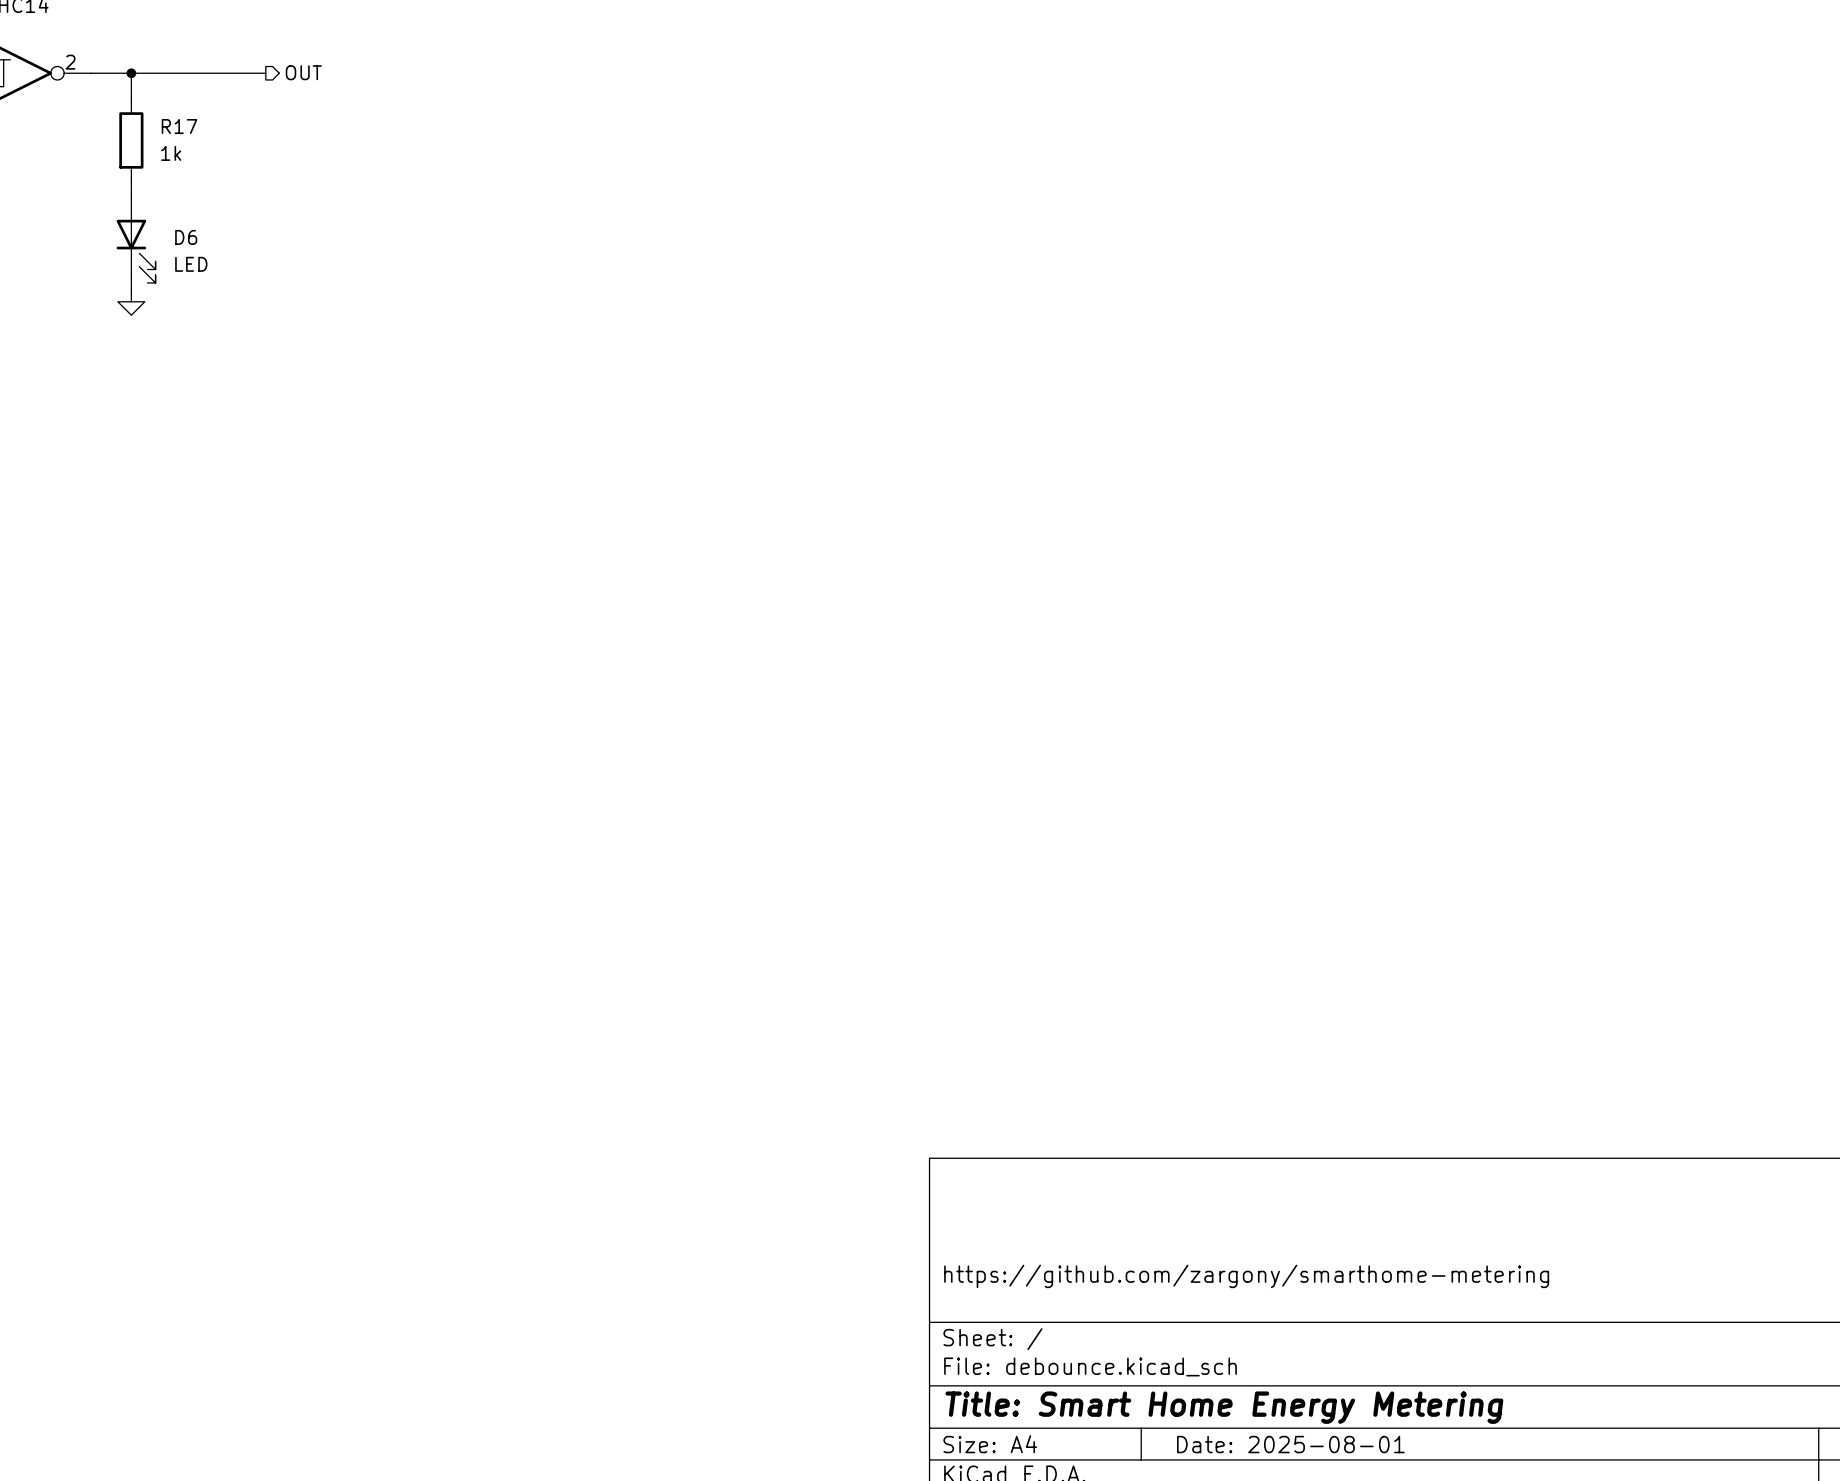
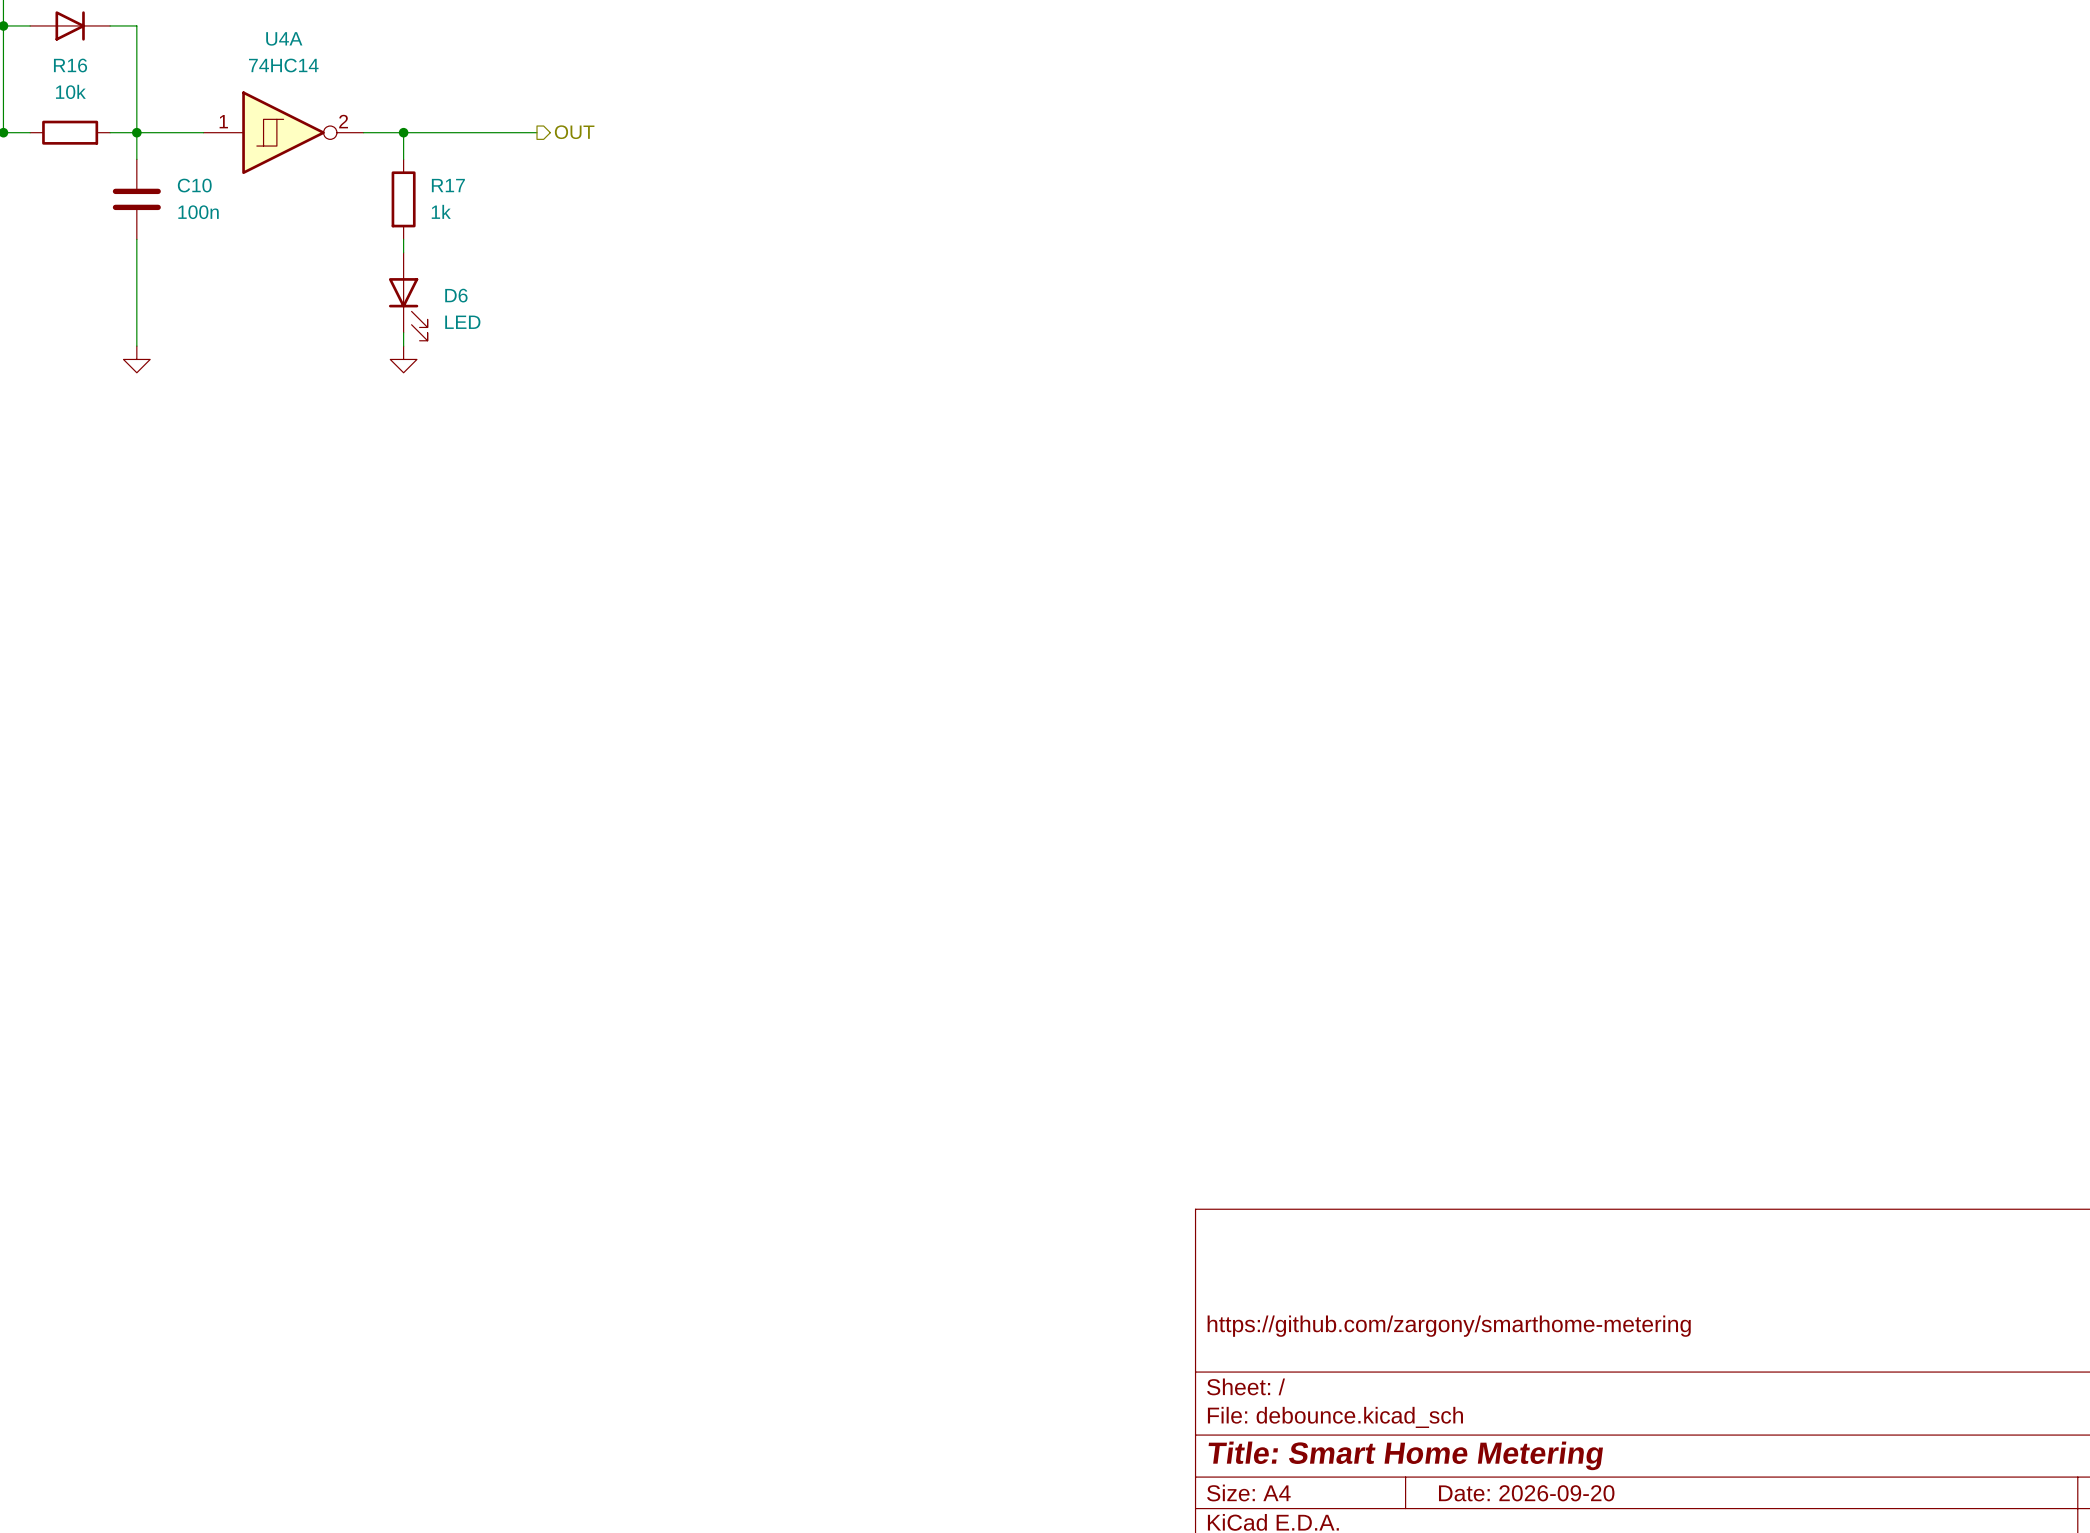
title block: Title: Smart Home Energy Metering (1224, 1407) -> Title: Smart Home Metering (1405, 1455)
title block: Date: 2025-08-01 (1290, 1444) -> Date: 2026-09-20 (1526, 1493)

